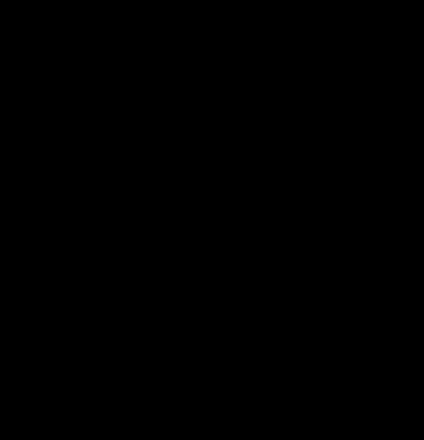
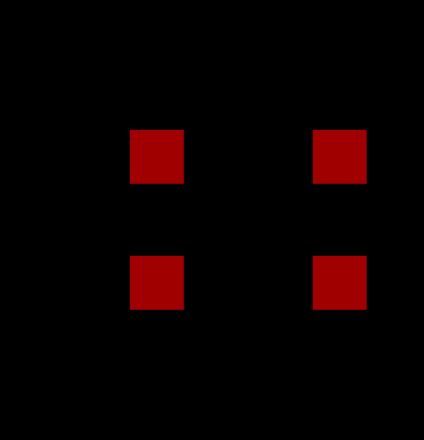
part: none -> (156, 219)
part: none -> (339, 219)

